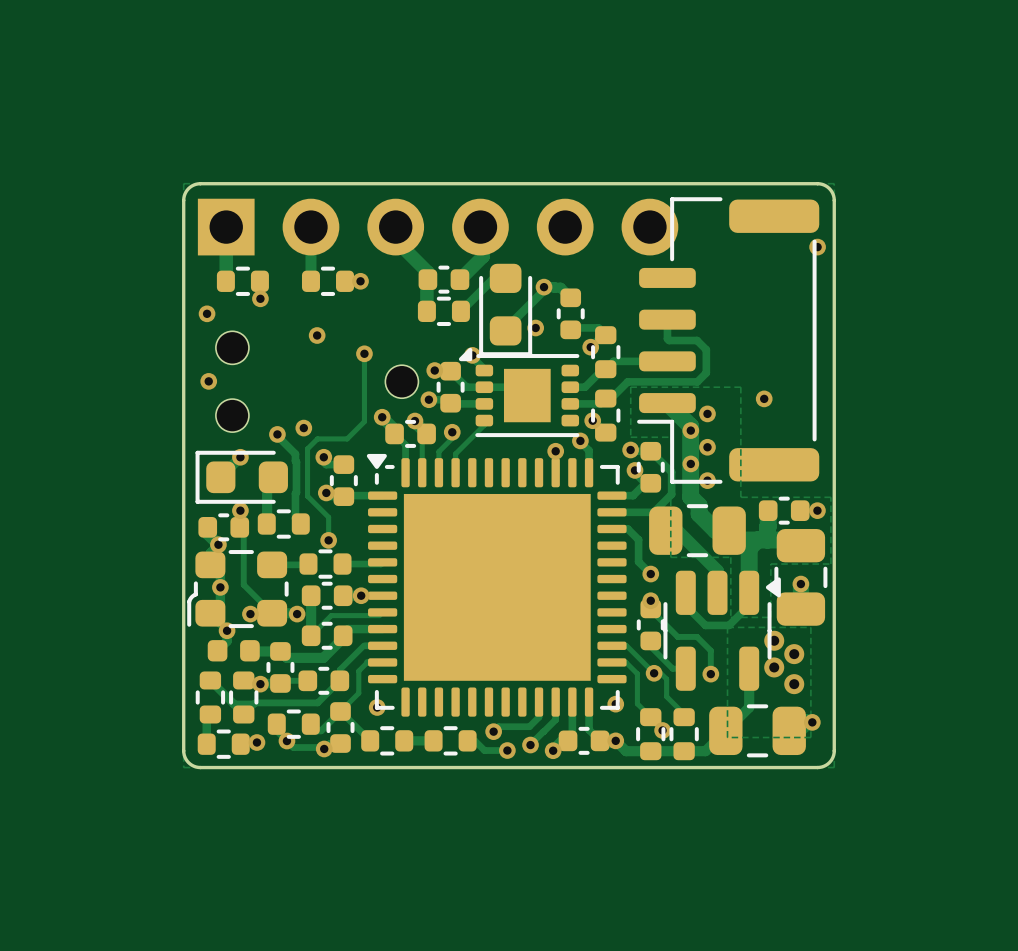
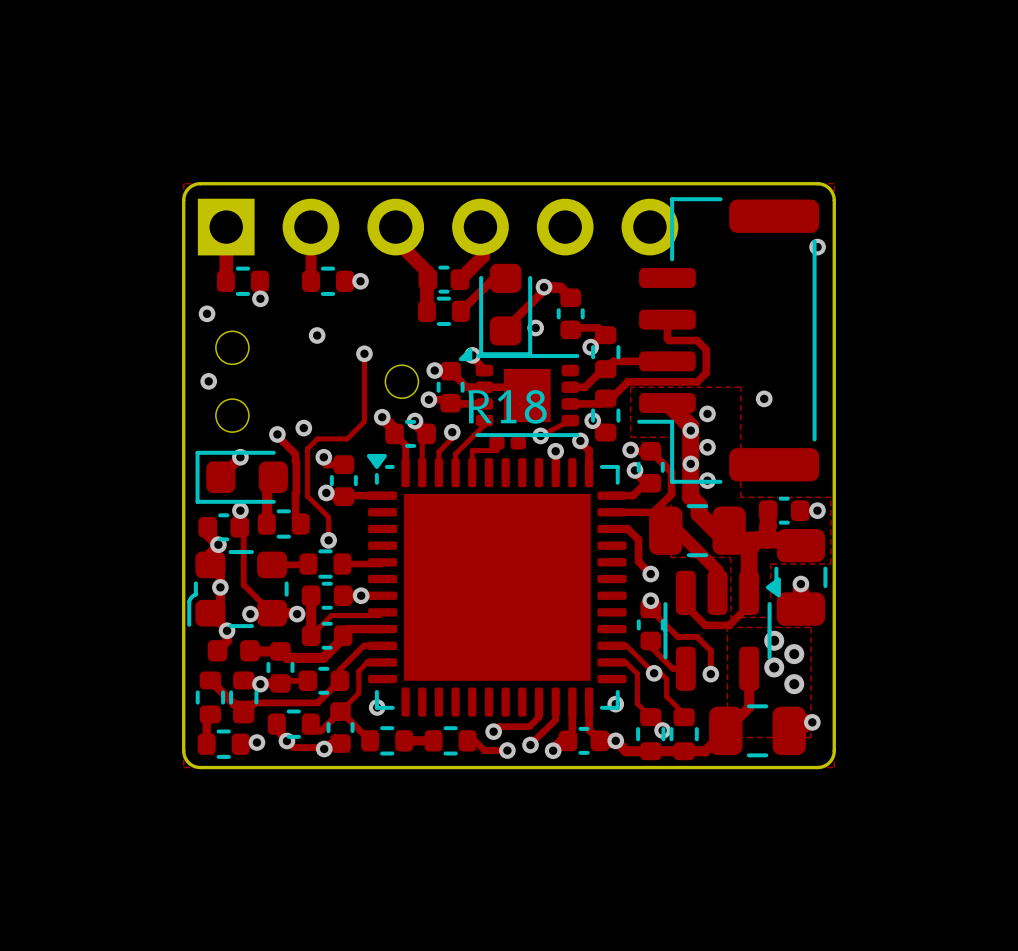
track: none -> (570, 420) (540, 435)
via: none -> (540, 435)
track: none -> (496, 442) (496, 450) (472, 450) (472, 472)
R18: none -> (507, 442)

